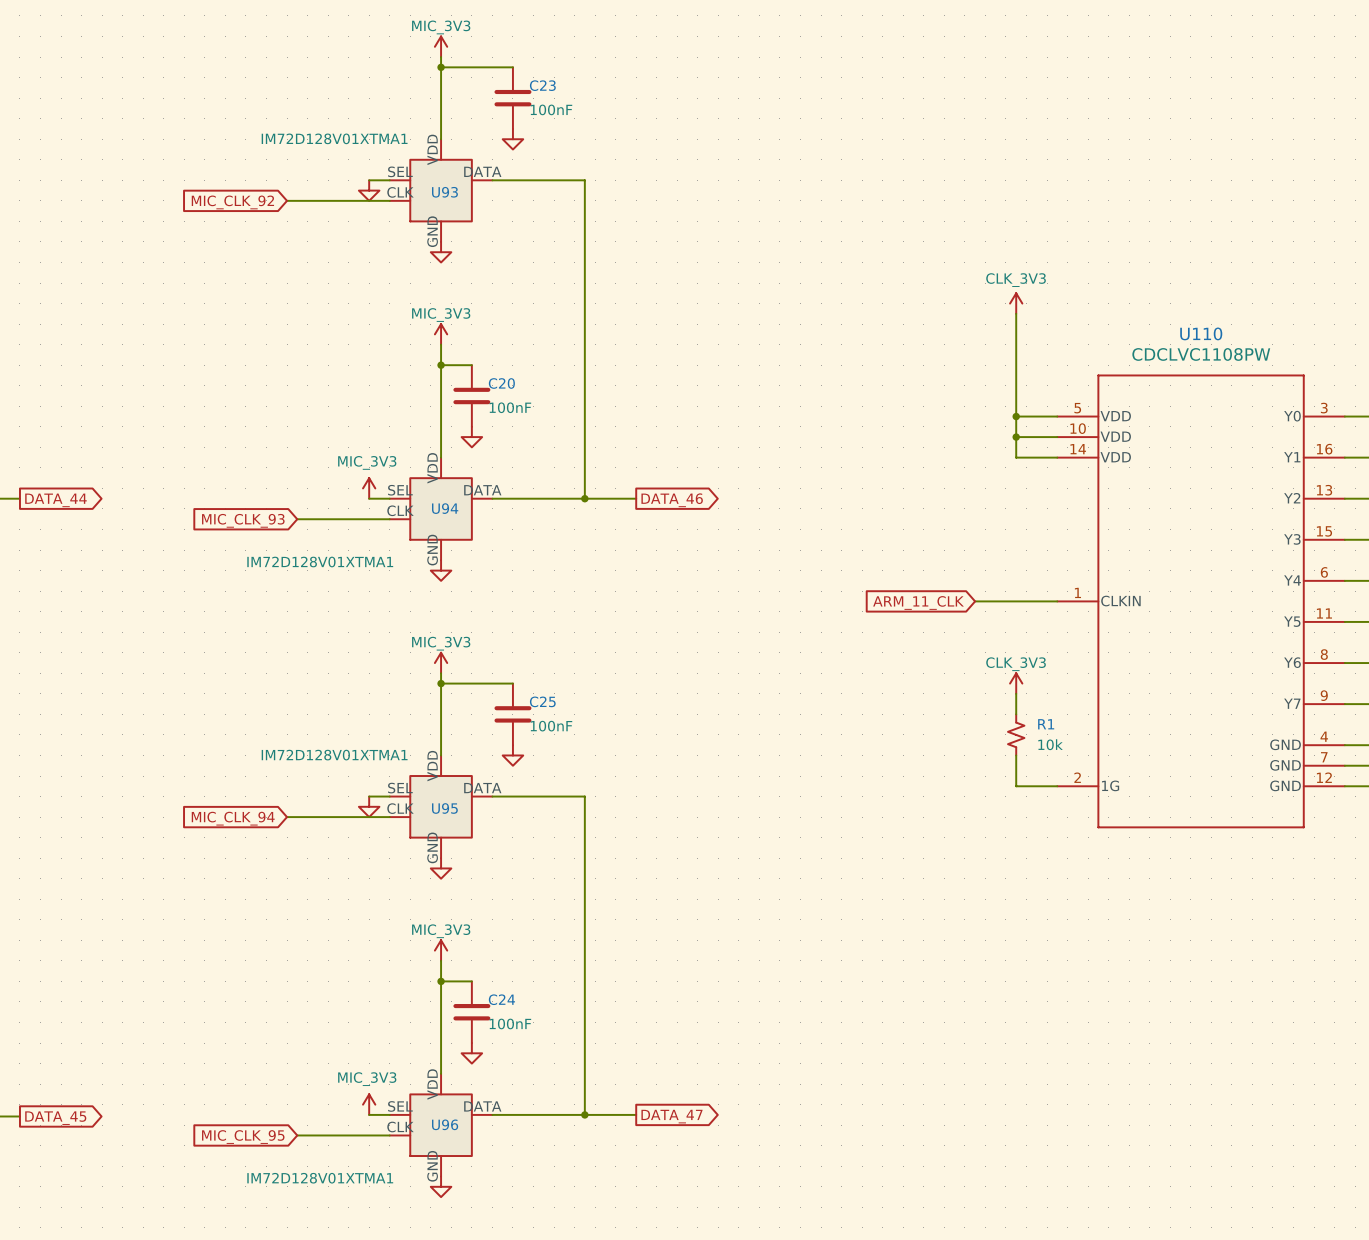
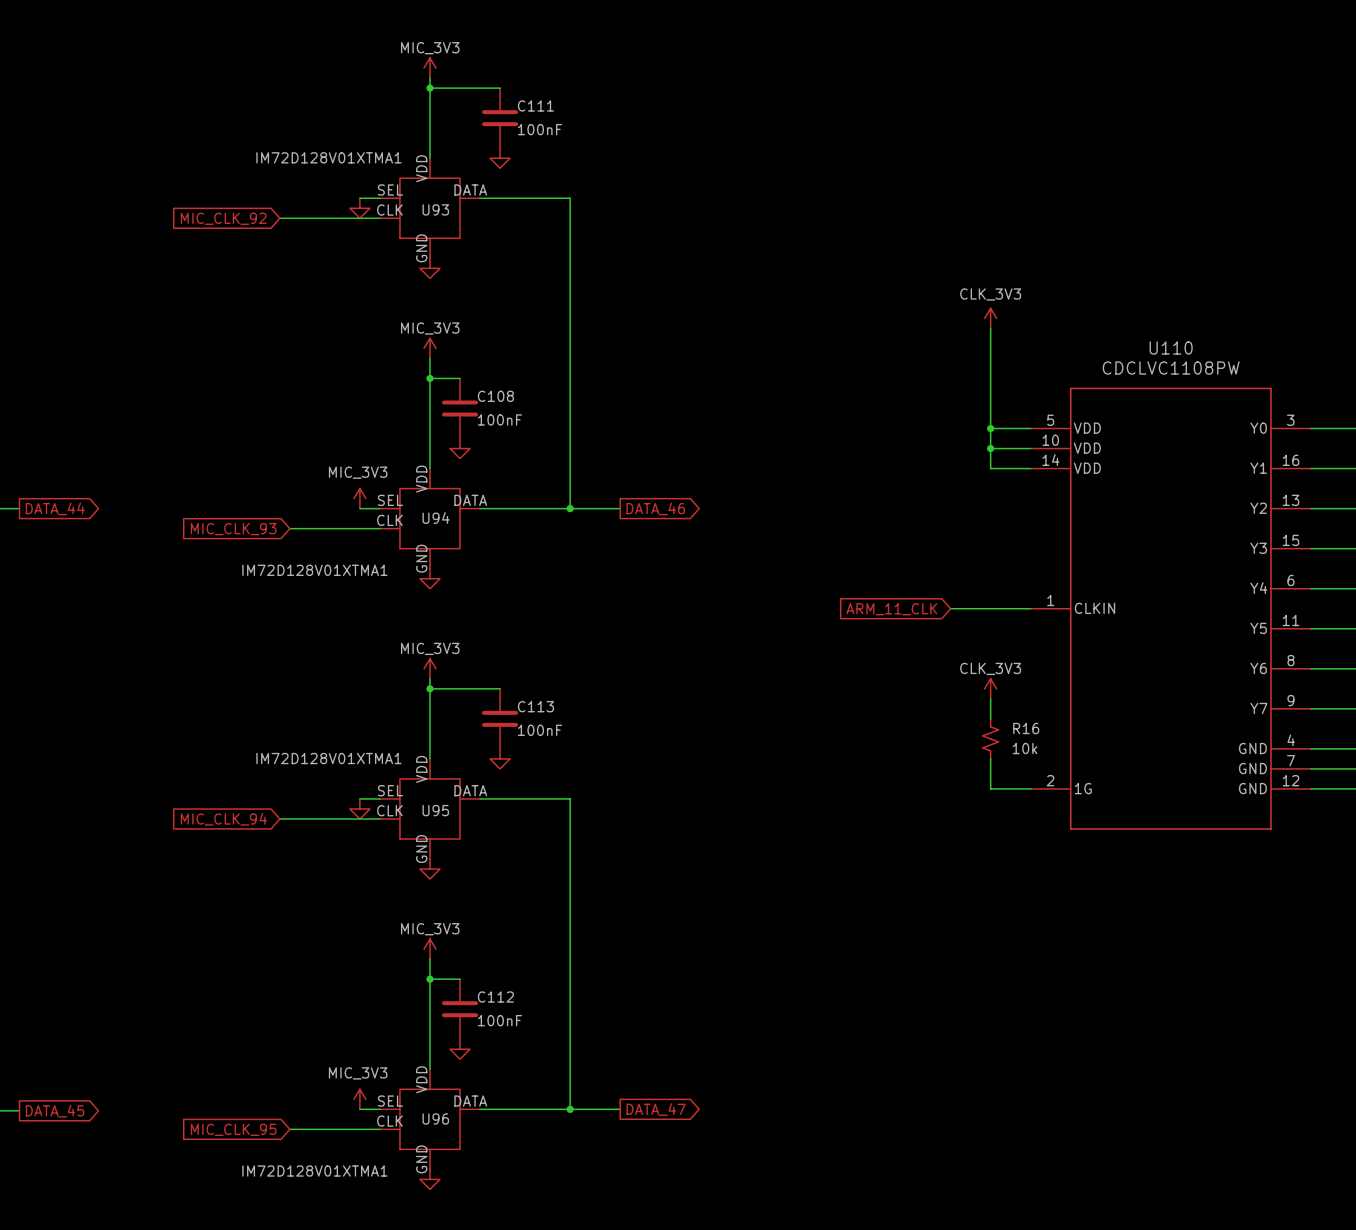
C23 name: C23 (542, 85) -> C111 (535, 105)
C20 name: C20 (501, 383) -> C108 (495, 396)
C25 name: C25 (542, 701) -> C113 (535, 706)
R1 name: R1 (1046, 724) -> R16 (1026, 728)
C24 name: C24 (501, 999) -> C112 (495, 997)

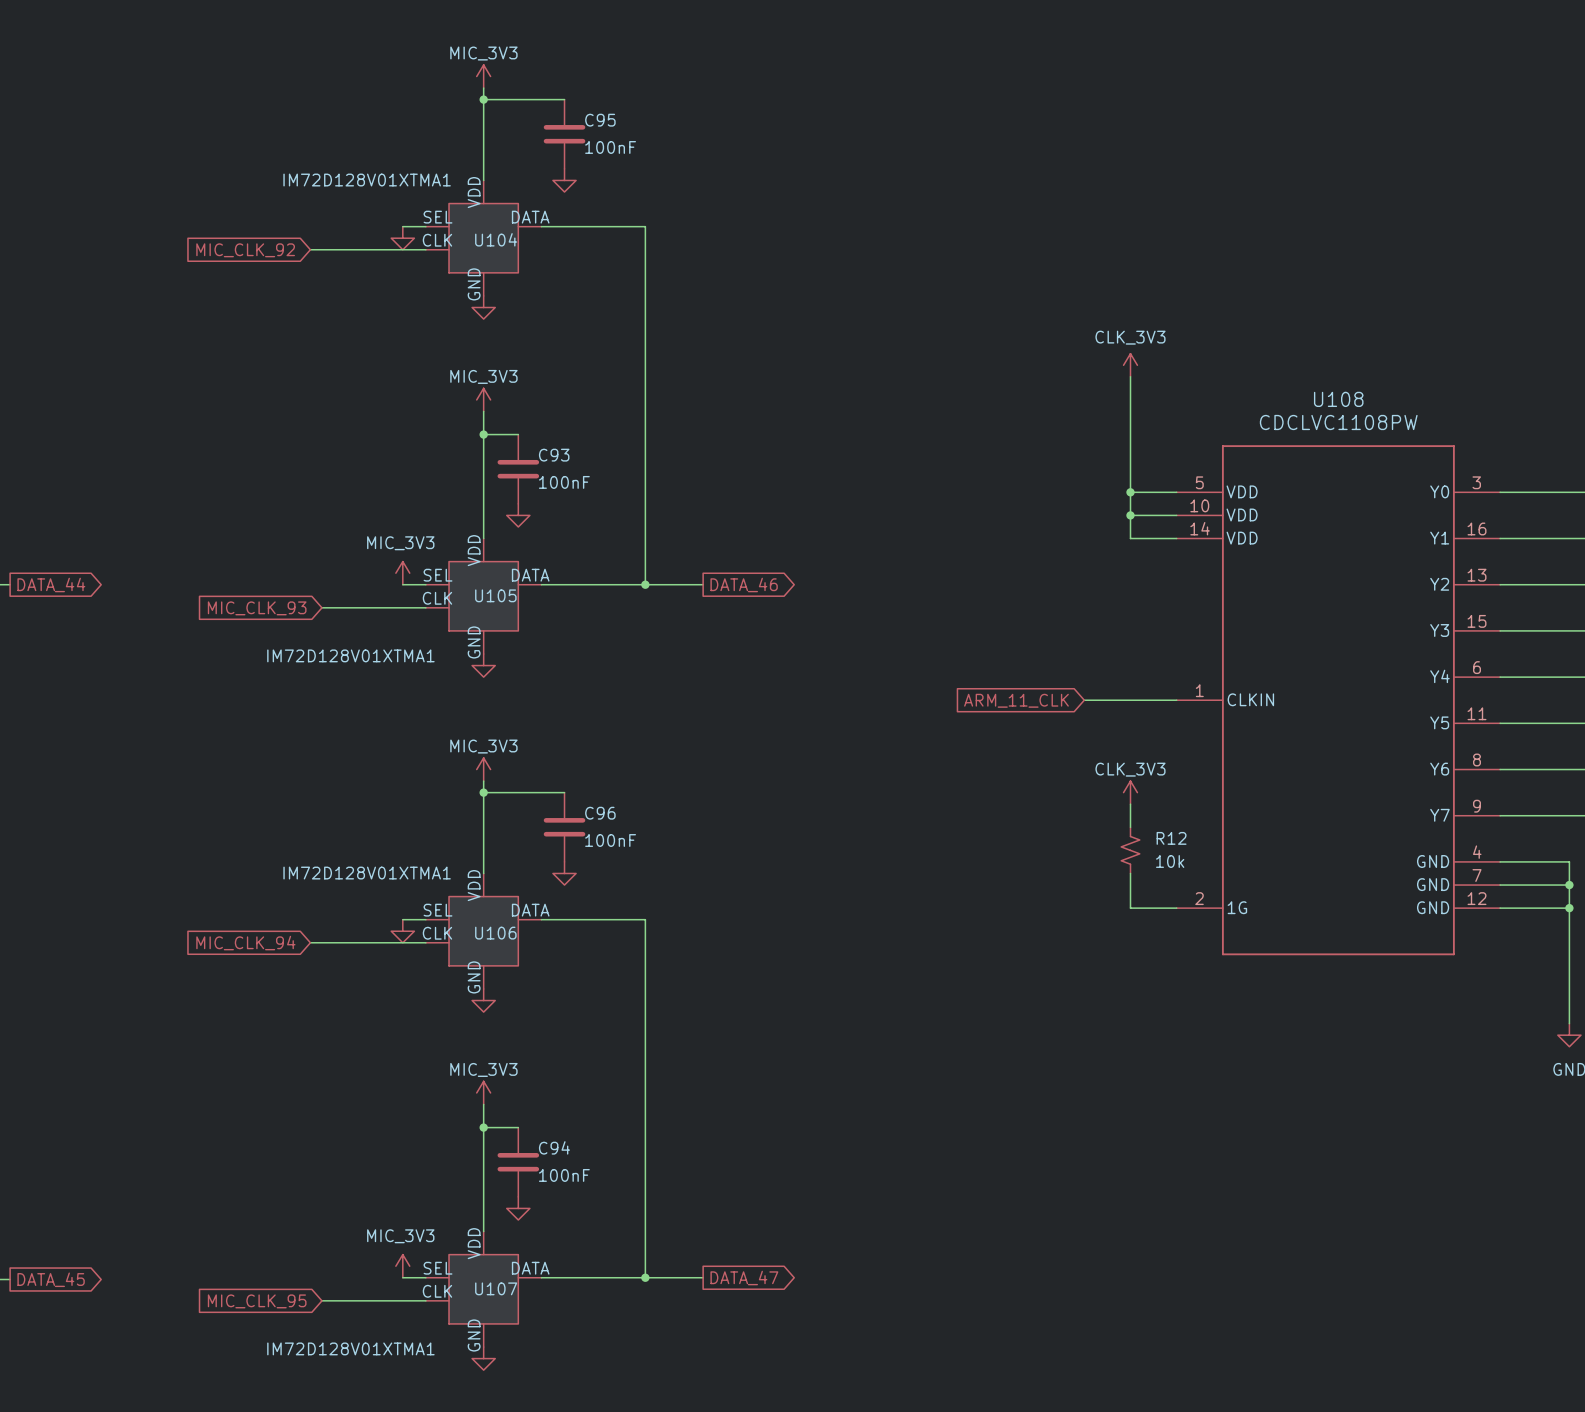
C111 name: C111 (535, 105) -> C95 (600, 120)
U93 name: U93 (435, 209) -> U104 (496, 239)
U110 name: U110 (1171, 347) -> U108 (1338, 399)
C108 name: C108 (495, 396) -> C93 (554, 455)
U94 name: U94 (436, 518) -> U105 (495, 595)
C113 name: C113 (535, 706) -> C96 (600, 813)
R16 name: R16 (1026, 728) -> R12 (1171, 838)
U95 name: U95 (435, 810) -> U106 (495, 933)
C112 name: C112 (495, 997) -> C94 (554, 1147)
U96 name: U96 (435, 1118) -> U107 (496, 1288)

